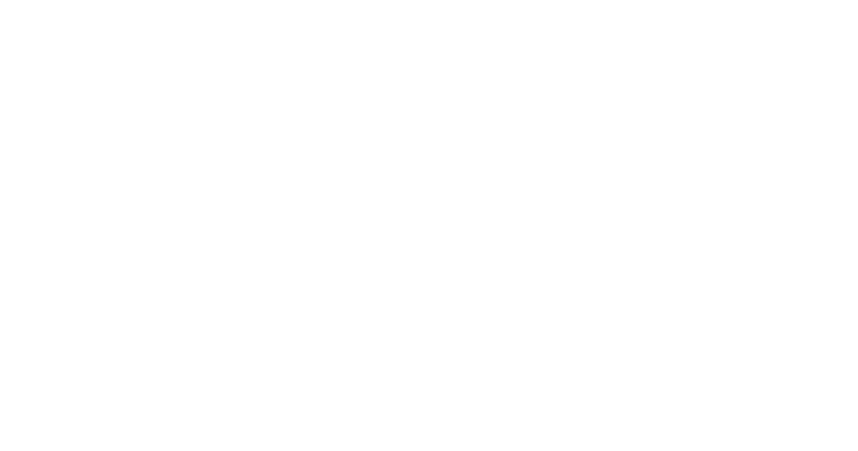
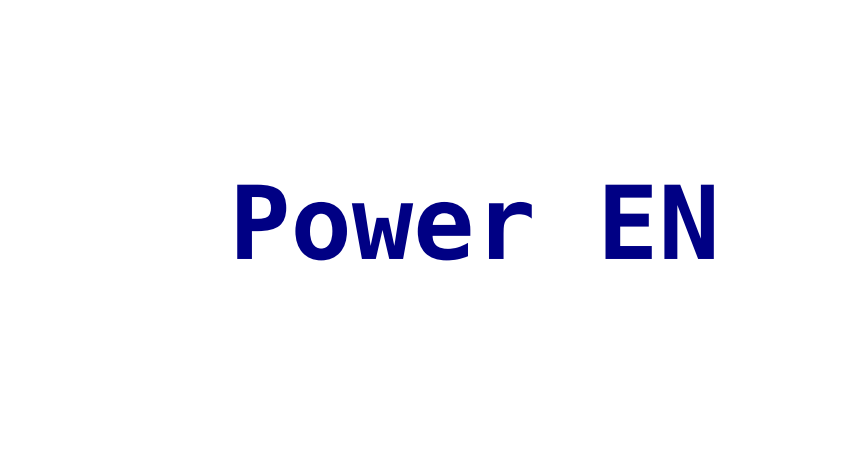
text: none -> Power EN (475, 222)

